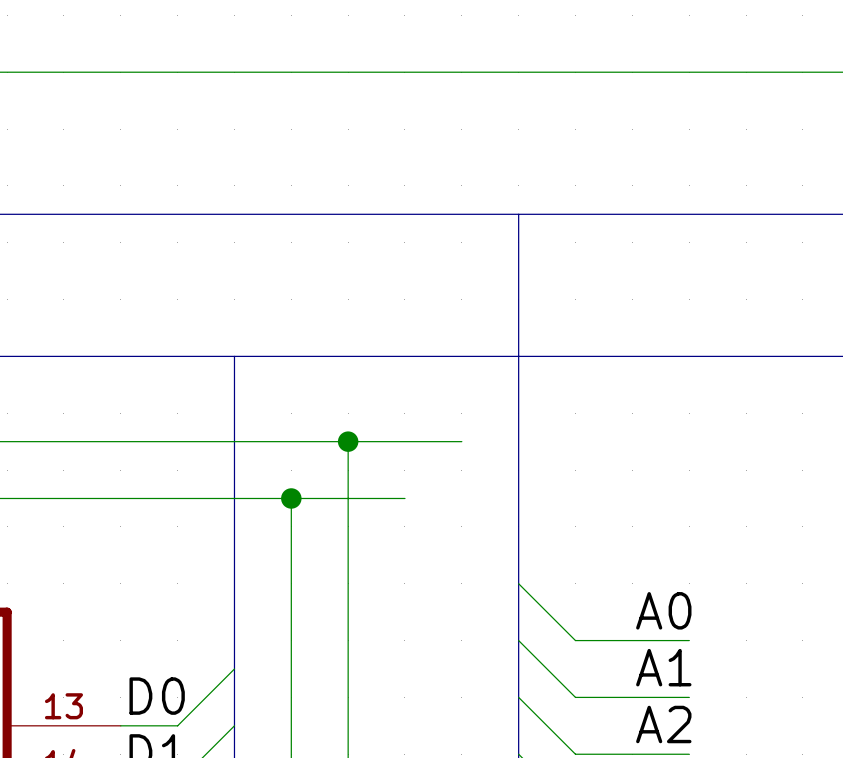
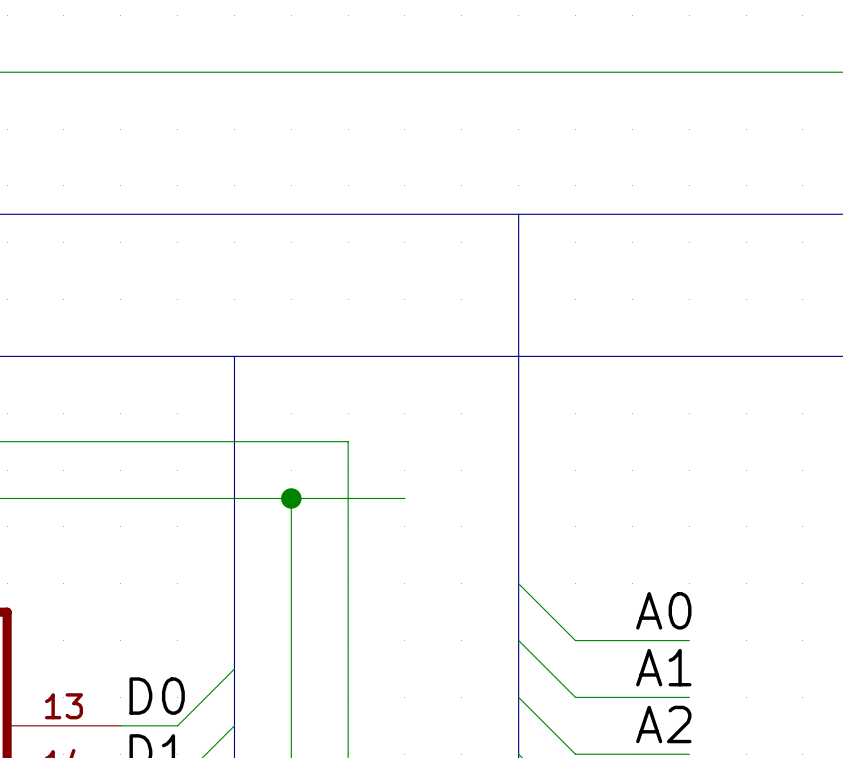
wire: (348, 441) (461, 441) -> none
junction: (348, 441) -> none

